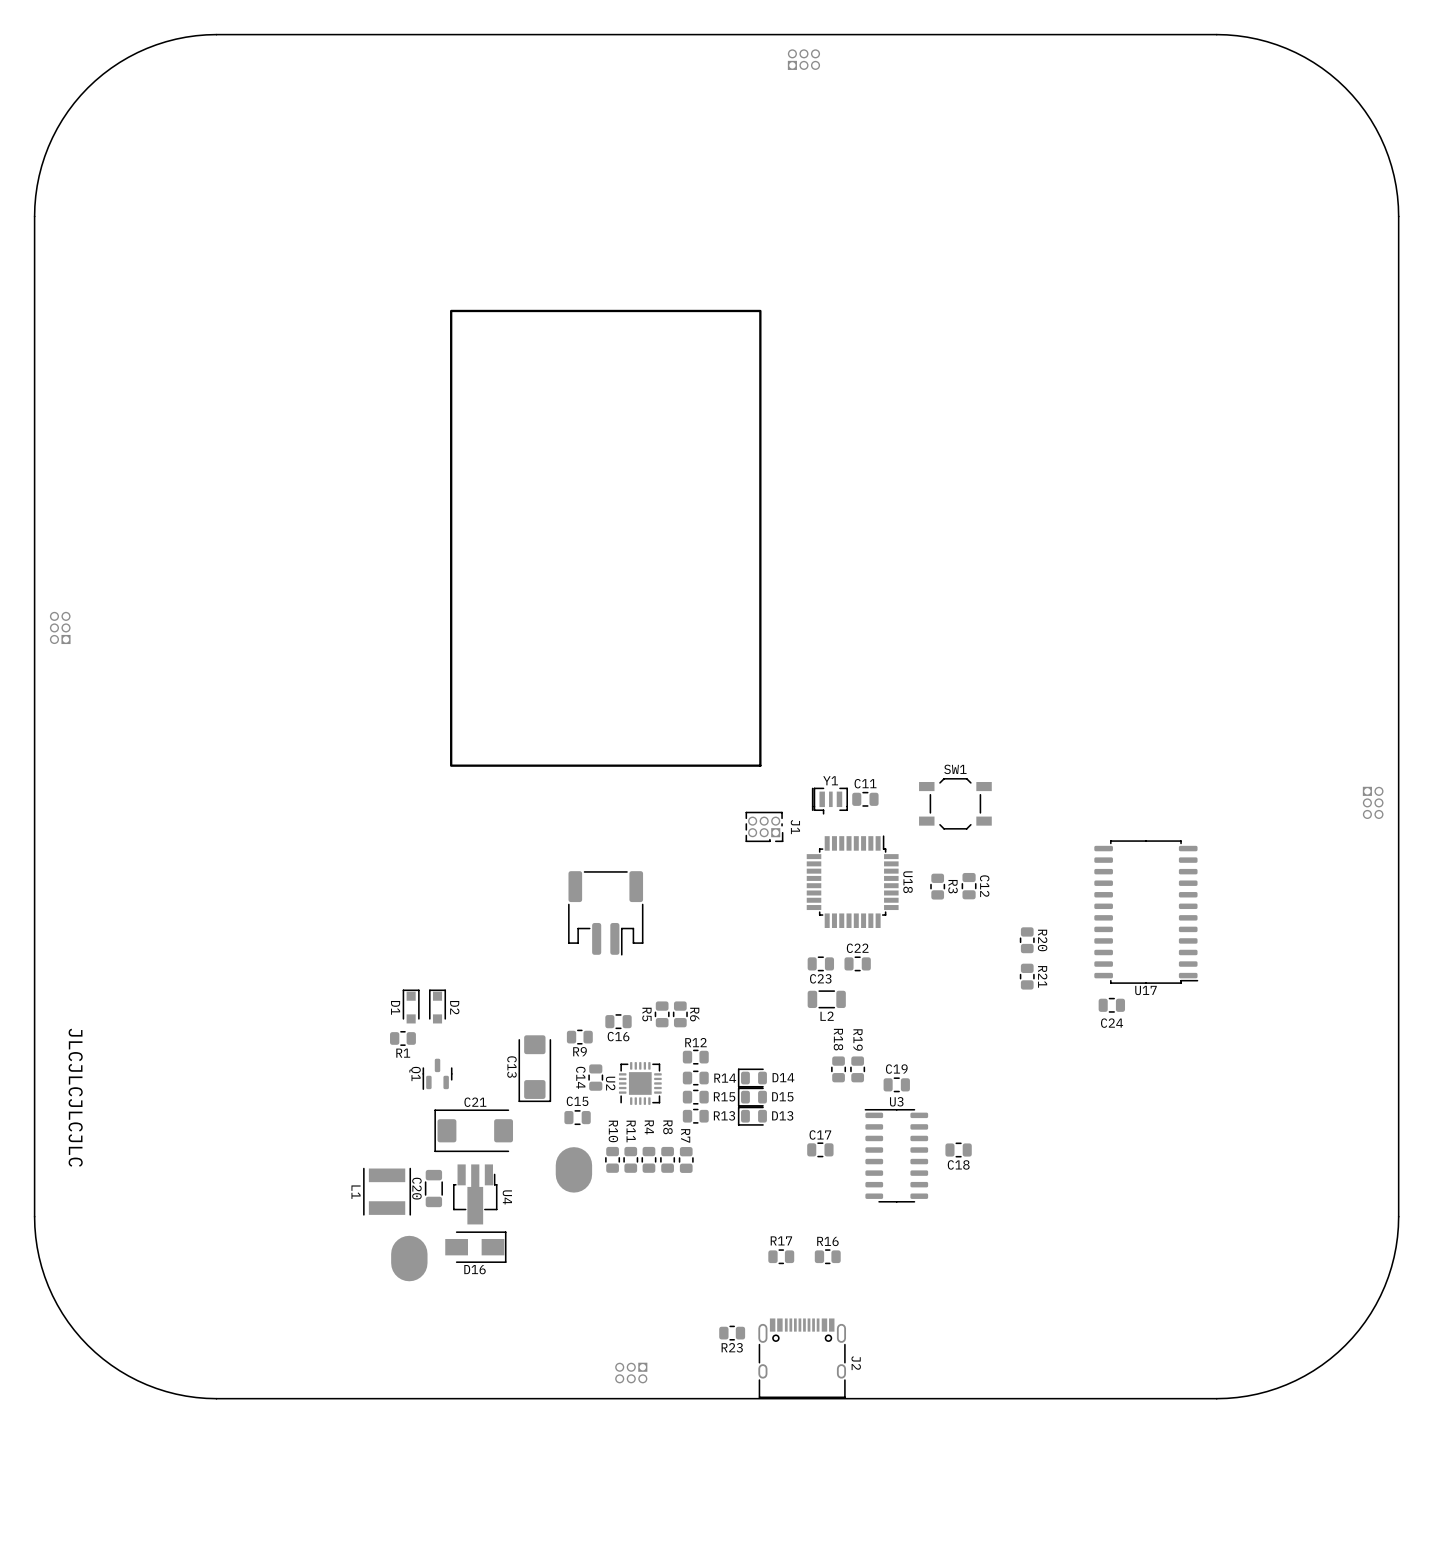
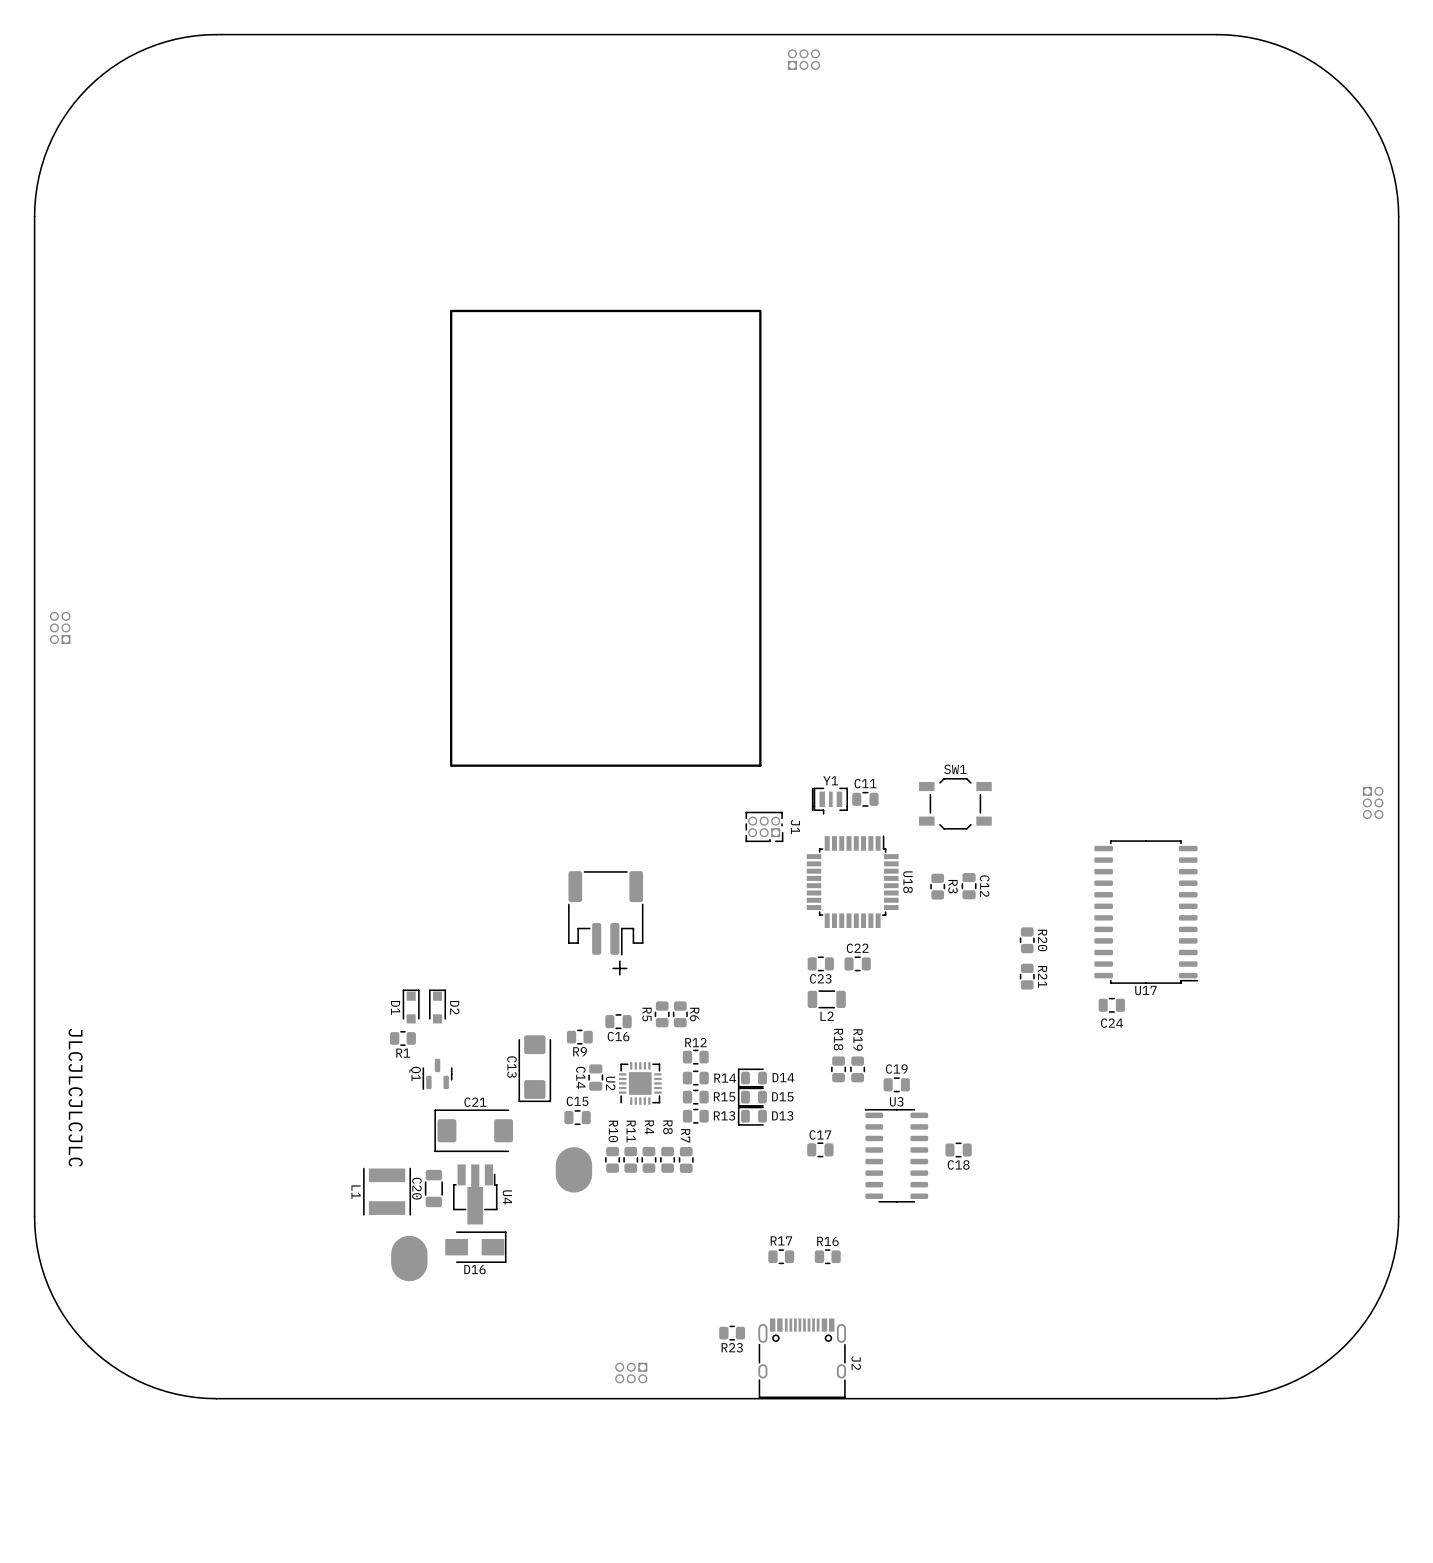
line: none -> (619, 961) (619, 974)
line: none -> (626, 968) (613, 968)

